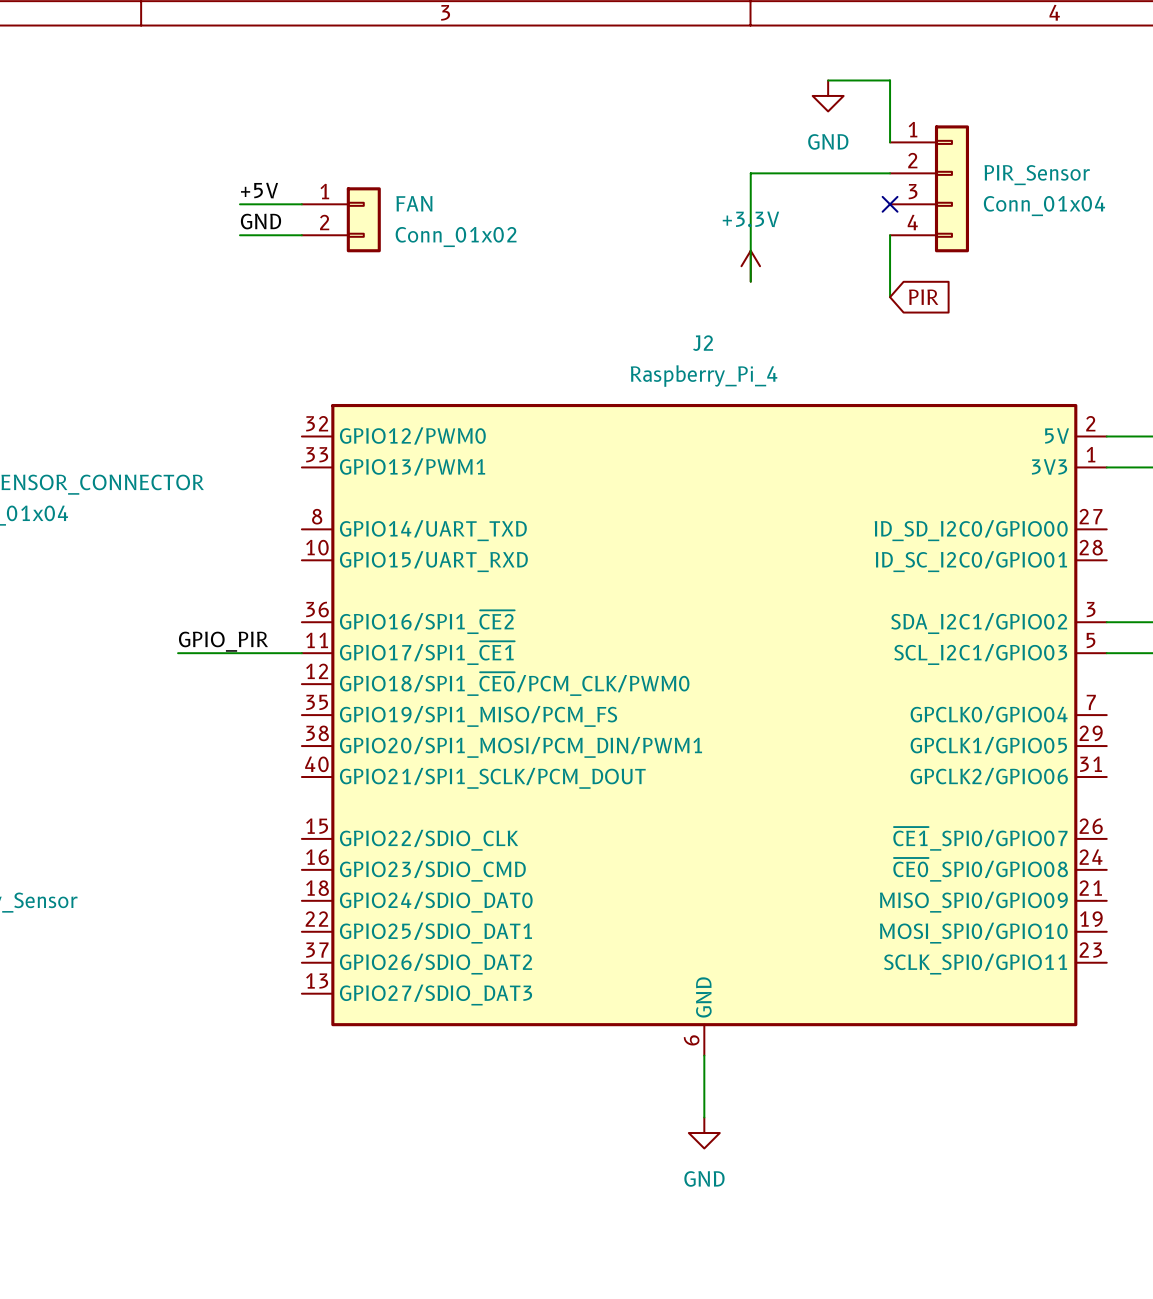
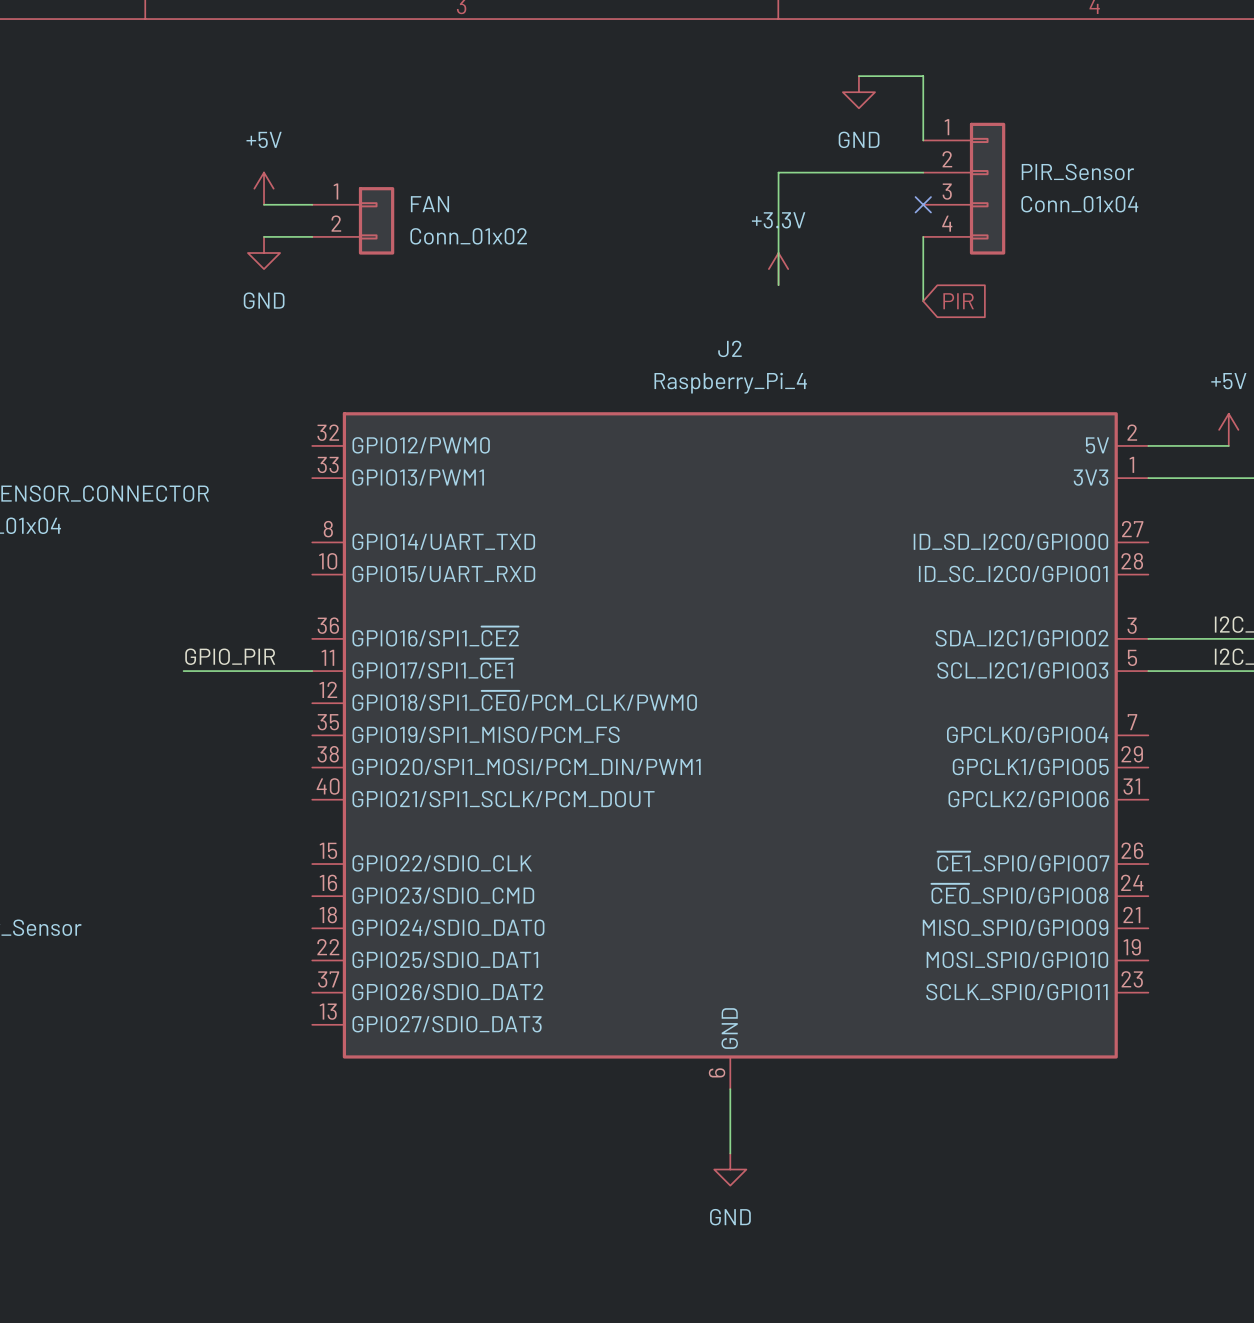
power symbol: none -> +5V (264, 188)
label: +5V (259, 190) -> none
wire: (239, 204) (255, 204) -> none
label: GND (260, 221) -> none
wire: (239, 235) (255, 235) -> none
power symbol: none -> GND (264, 253)

